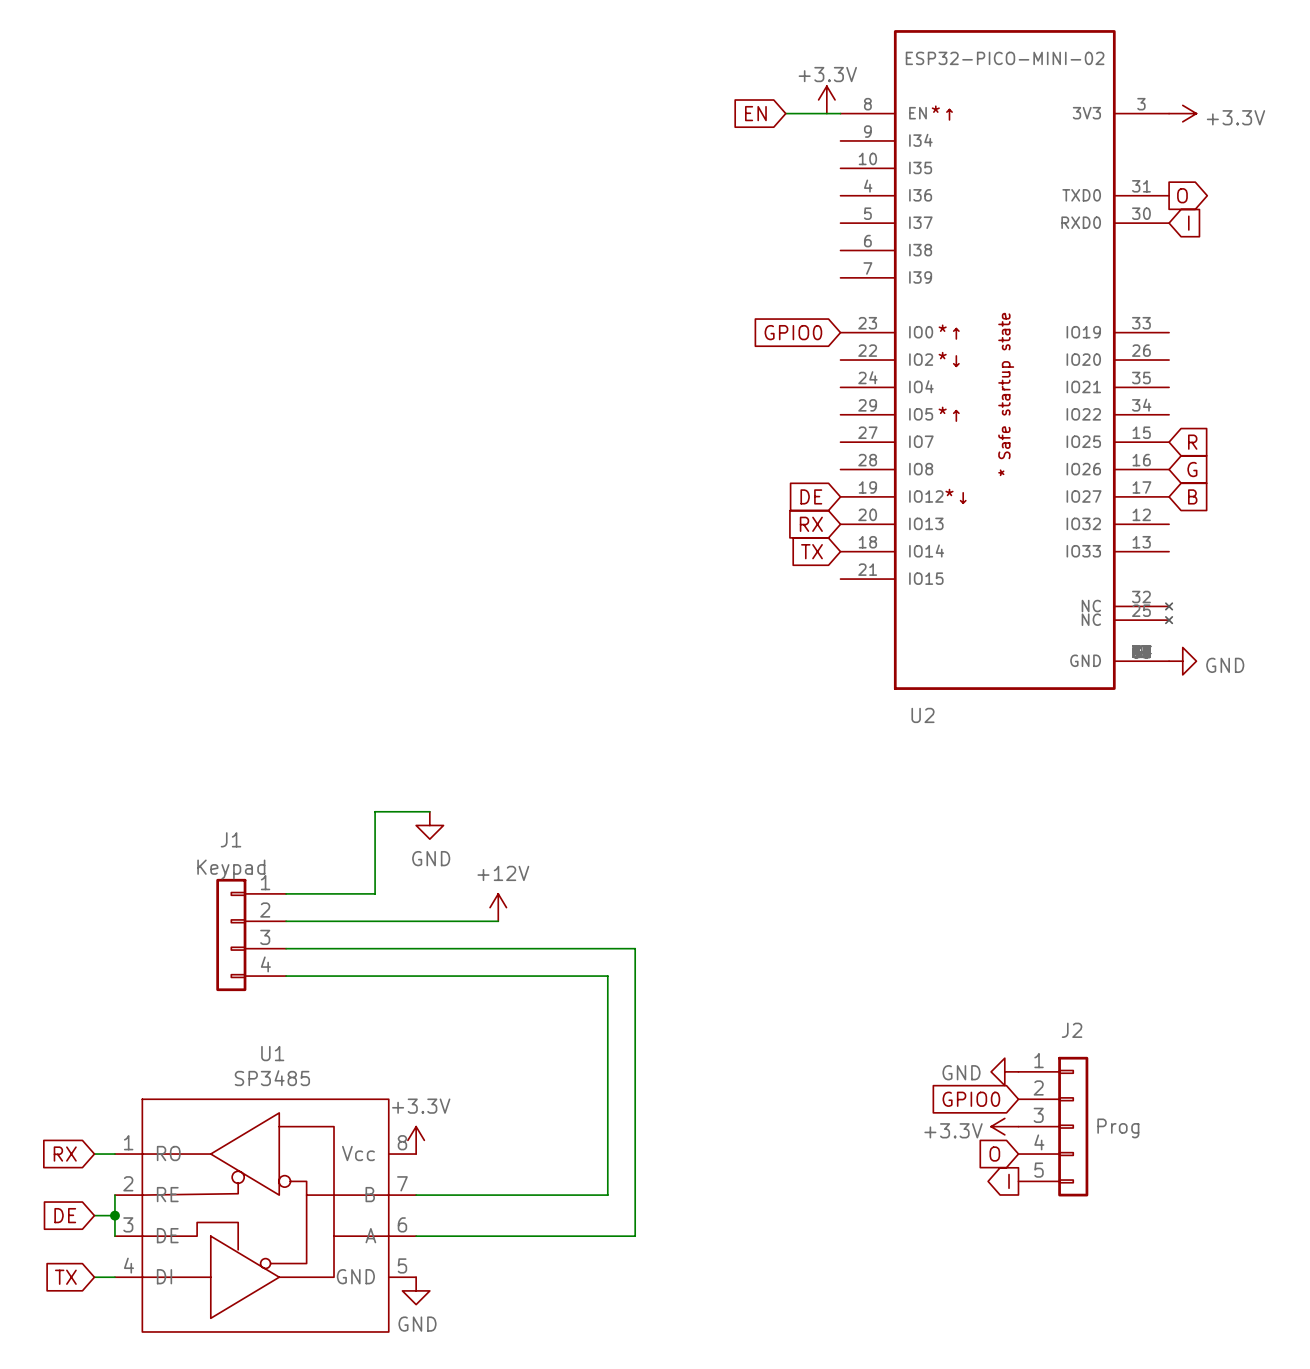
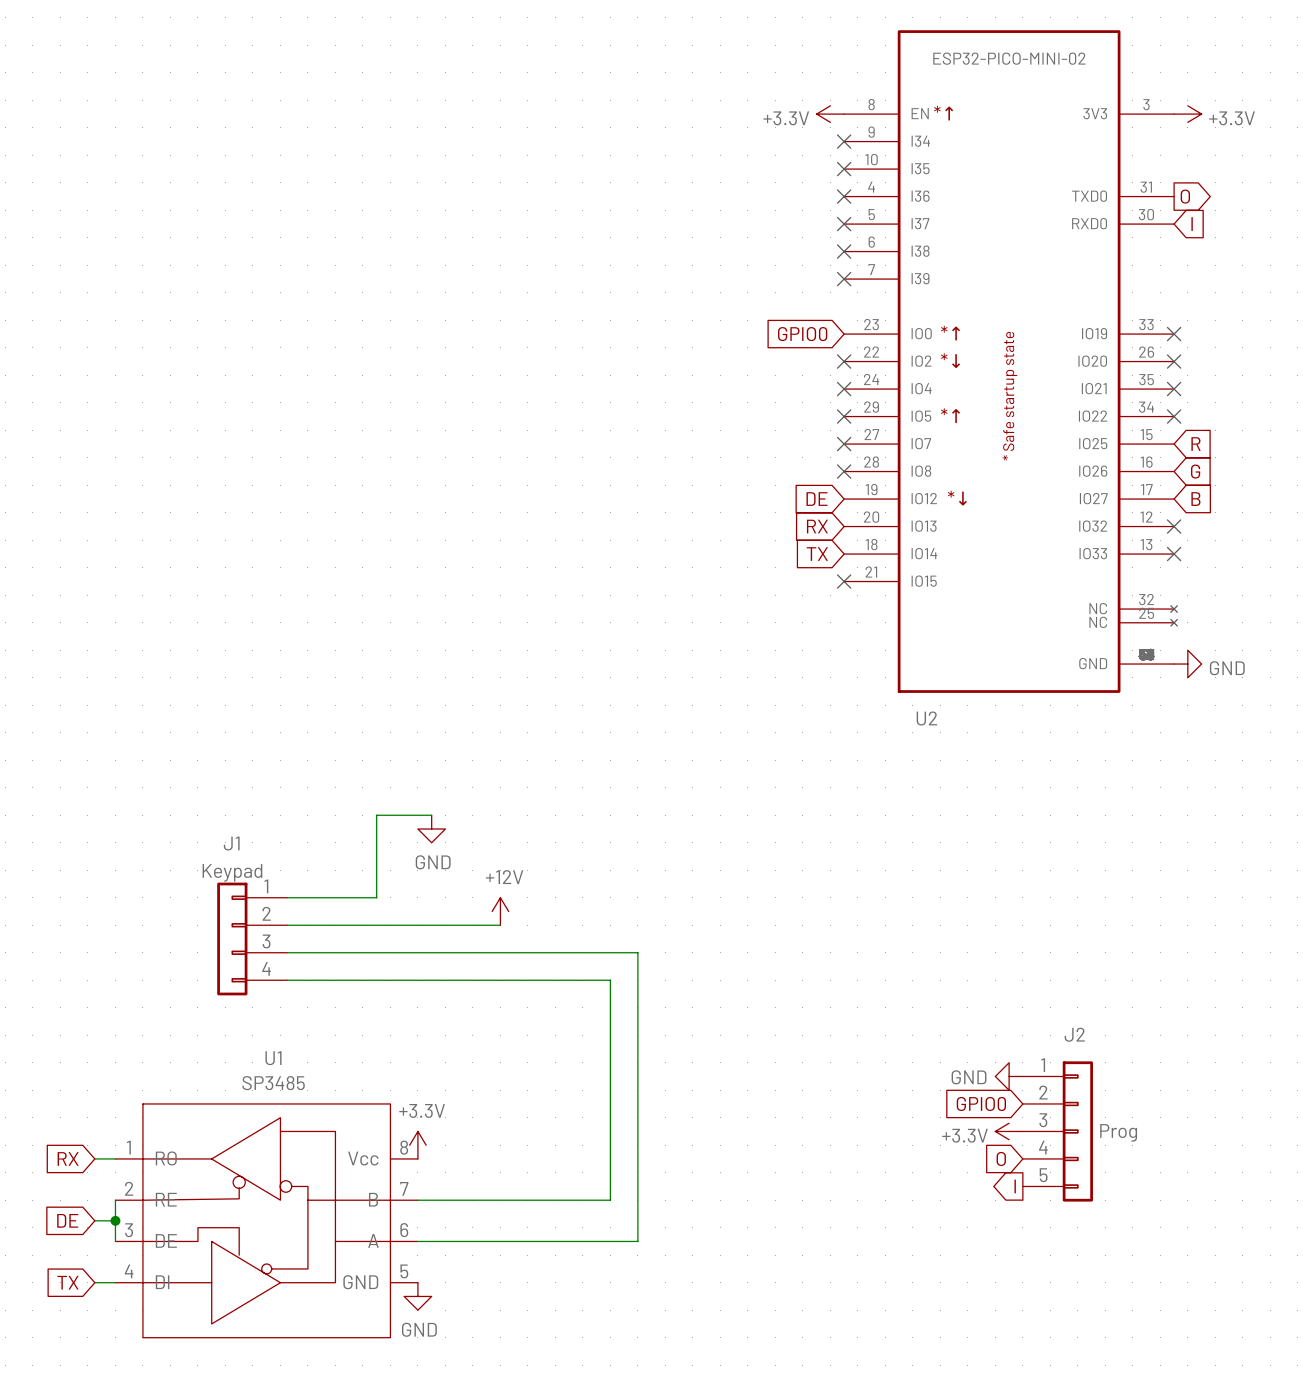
power symbol text position: +3.3V (827, 74) -> +3.3V (786, 118)
power symbol rotation: 0° (826, 99) -> 90° counterclockwise (830, 114)
global label: EN (755, 113) -> none
no-connect mark: none -> (844, 141)
no-connect mark: none -> (844, 169)
no-connect mark: none -> (844, 196)
no-connect mark: none -> (844, 224)
no-connect mark: none -> (844, 251)
no-connect mark: none -> (844, 279)
no-connect mark: none -> (1174, 334)
no-connect mark: none -> (844, 361)
no-connect mark: none -> (1174, 361)
no-connect mark: none -> (844, 389)
no-connect mark: none -> (1174, 389)
no-connect mark: none -> (844, 416)
no-connect mark: none -> (1174, 416)
no-connect mark: none -> (844, 444)
no-connect mark: none -> (844, 471)
no-connect mark: none -> (1174, 526)
no-connect mark: none -> (1174, 554)
no-connect mark: none -> (844, 581)

